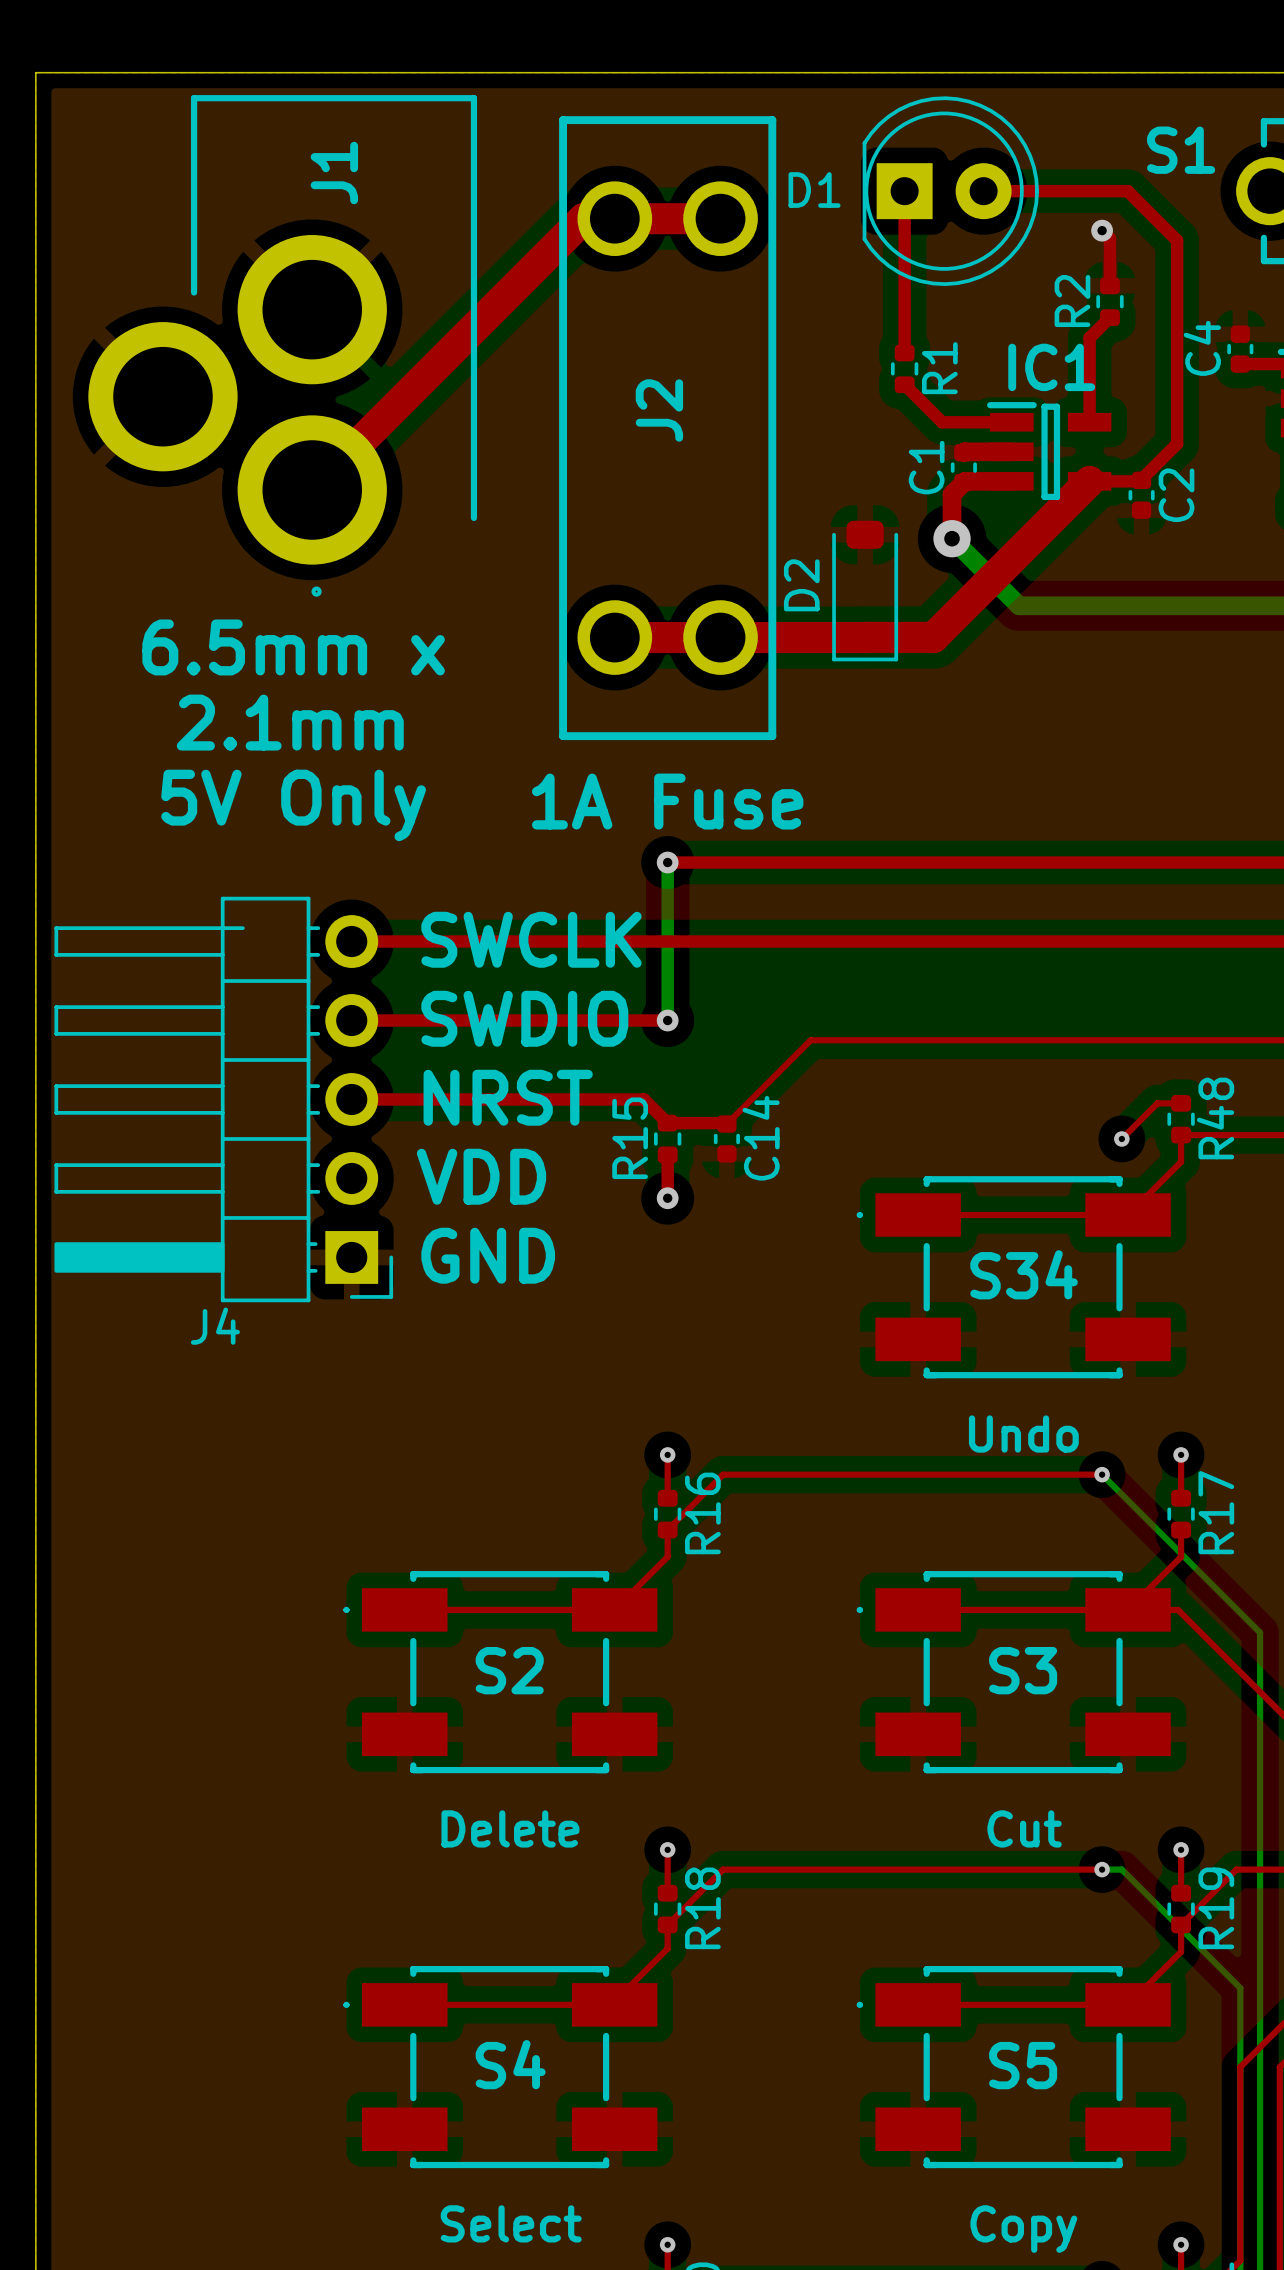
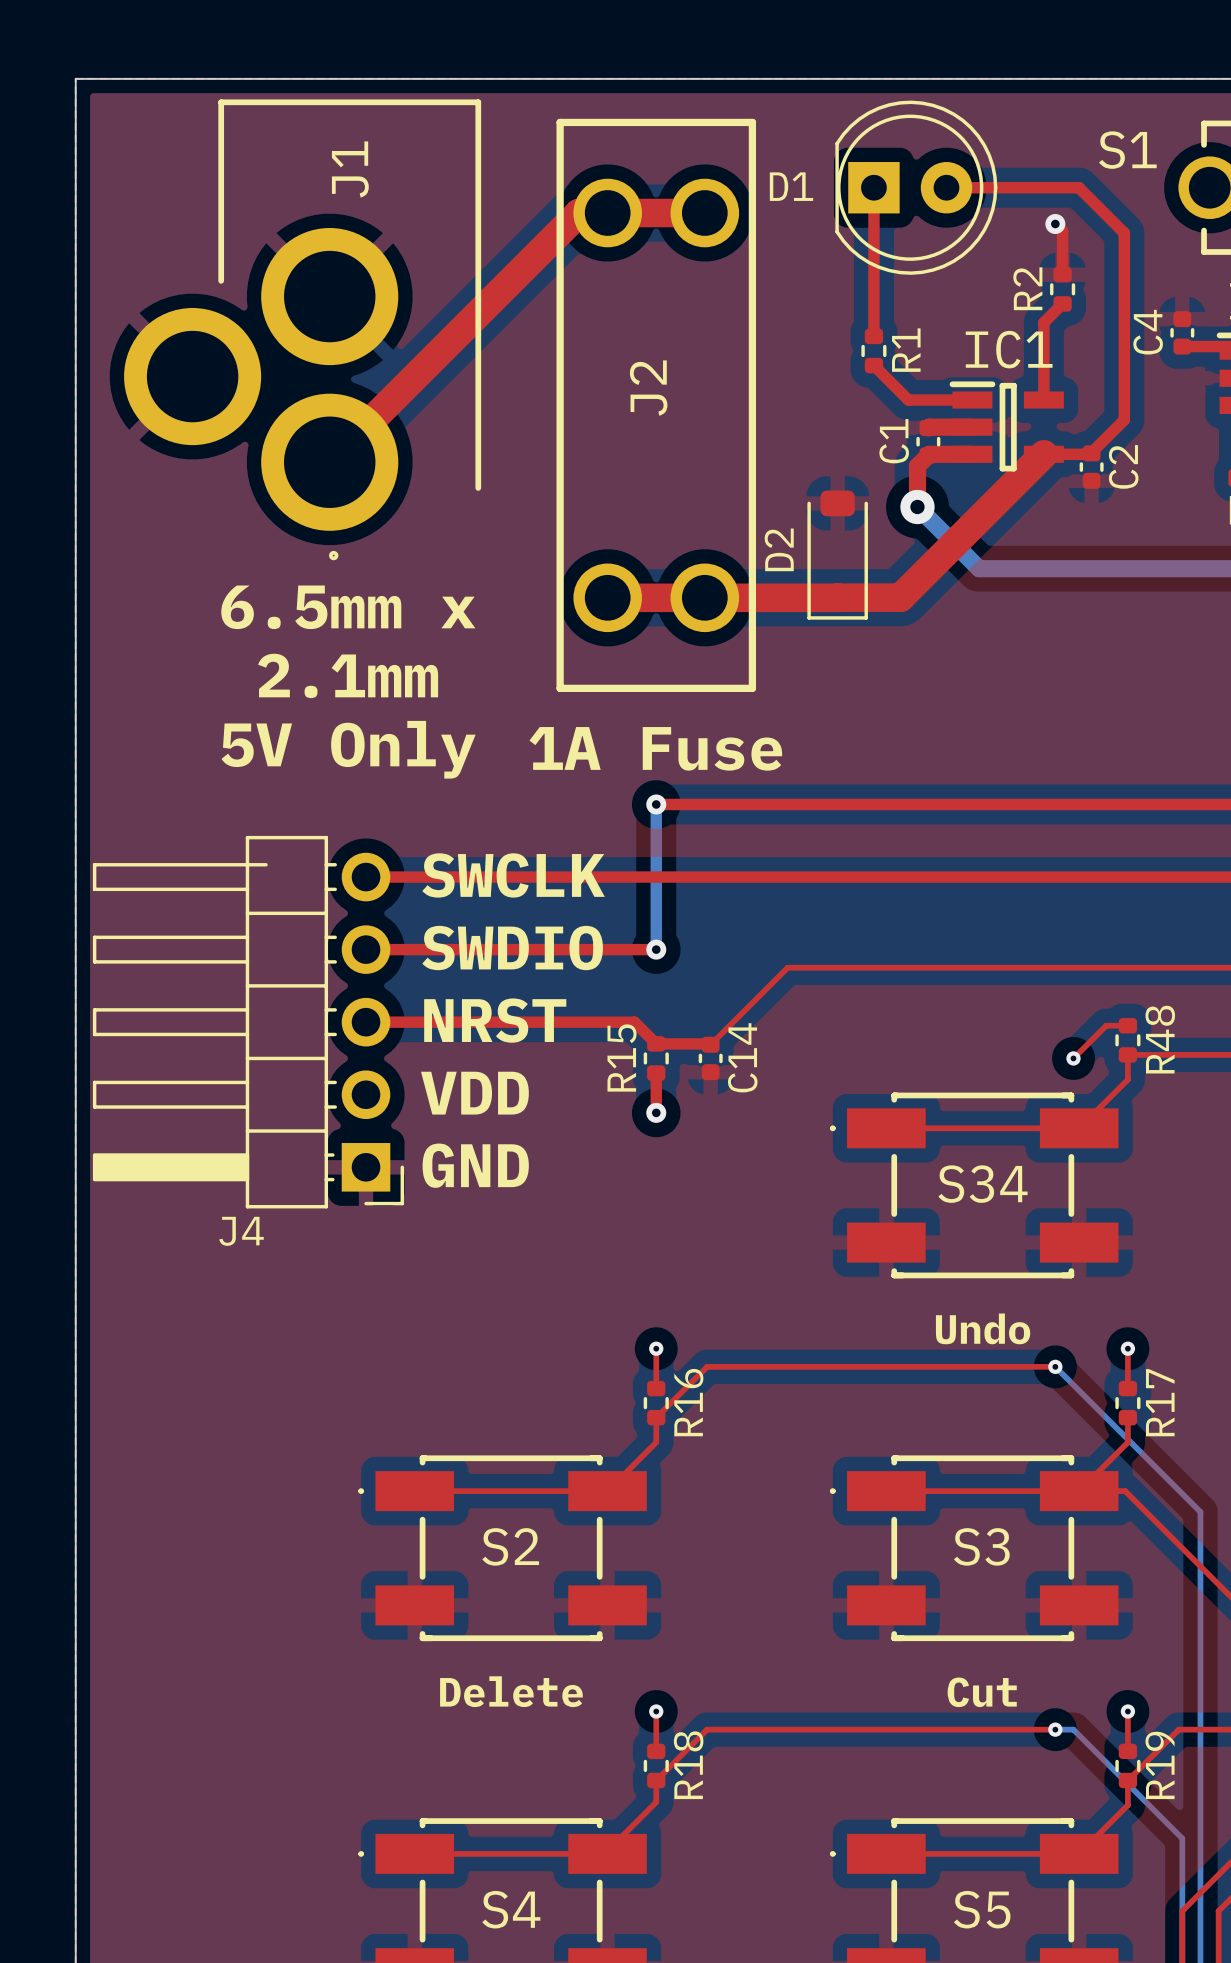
text position: 6.5mm x (293, 647) -> 6.5mm x (348, 607)
text position: 2.1mm (290, 722) -> 2.1mm (348, 675)
text position: 5V Only (293, 805) -> 5V Only (348, 749)

